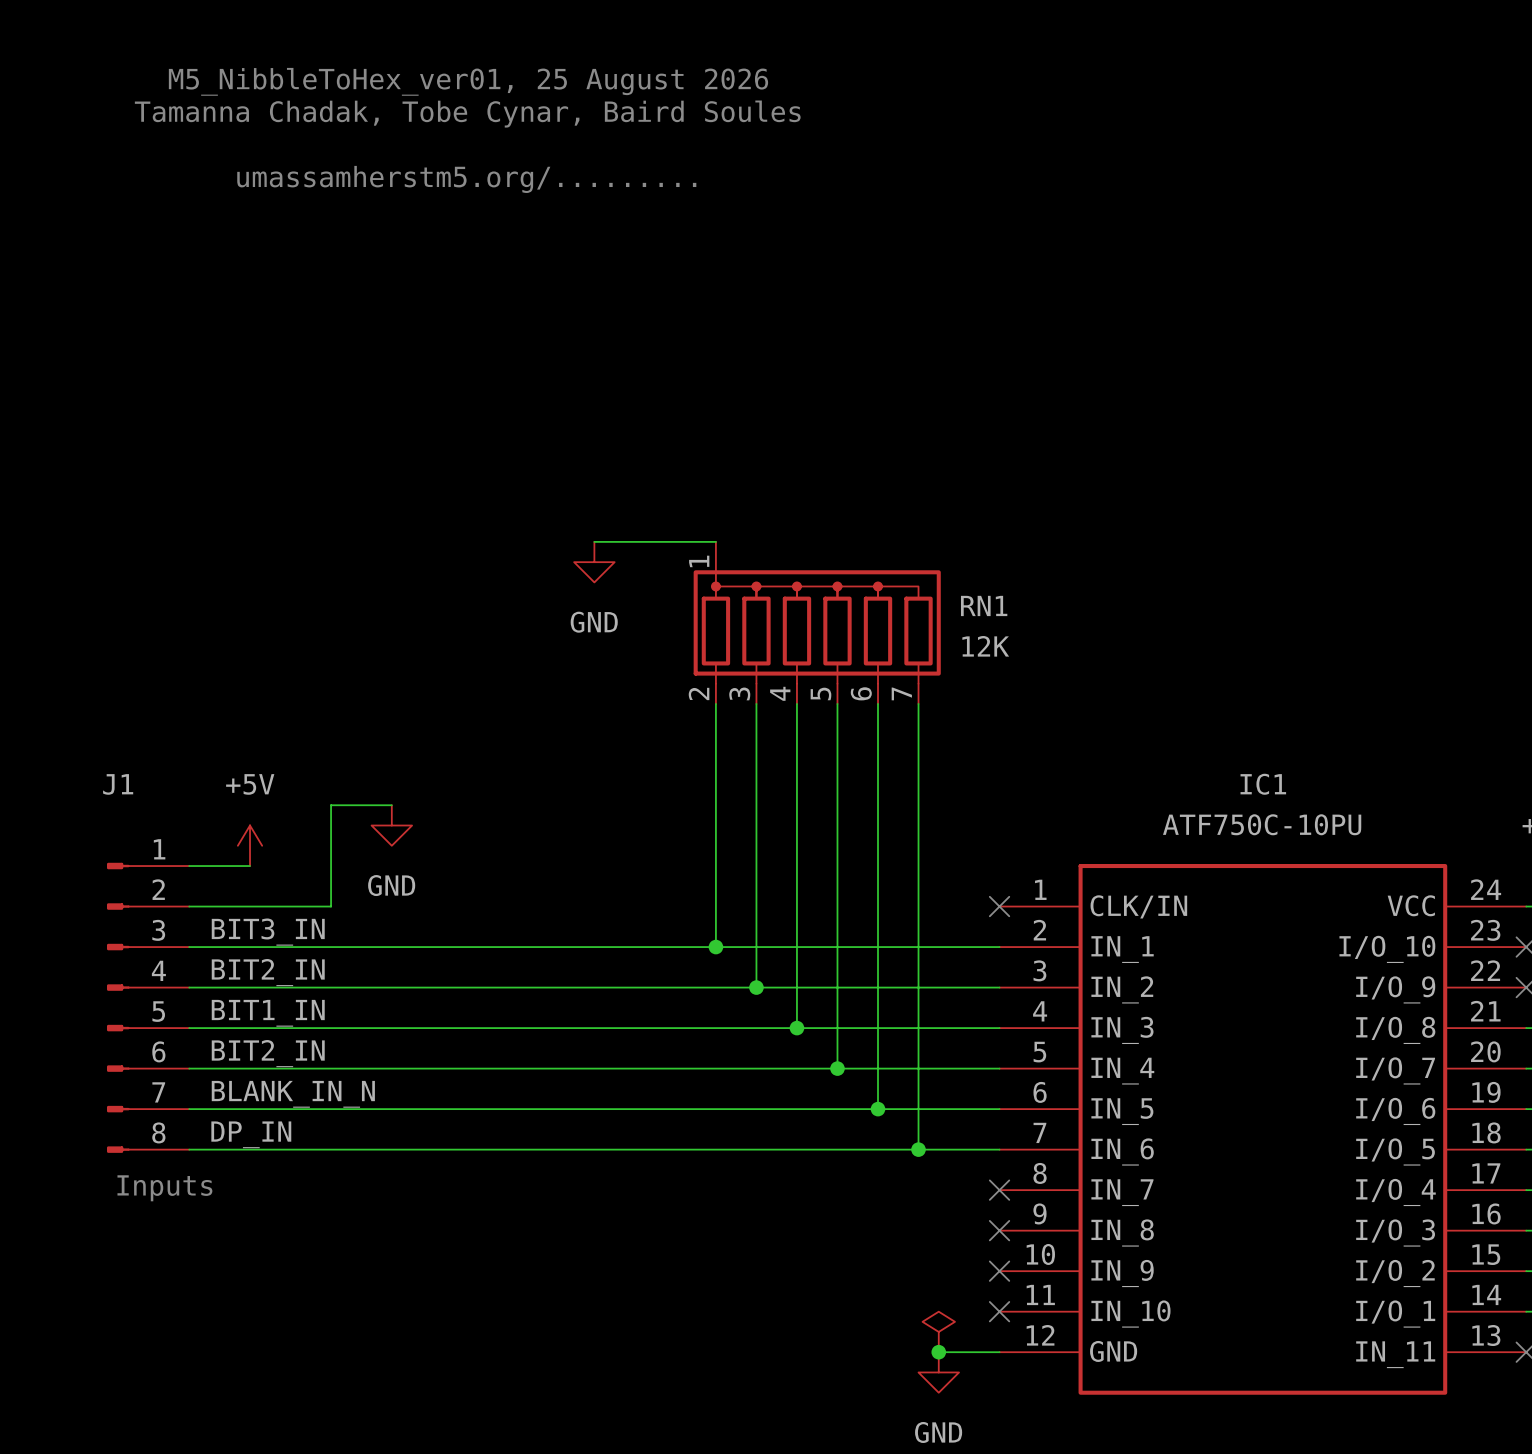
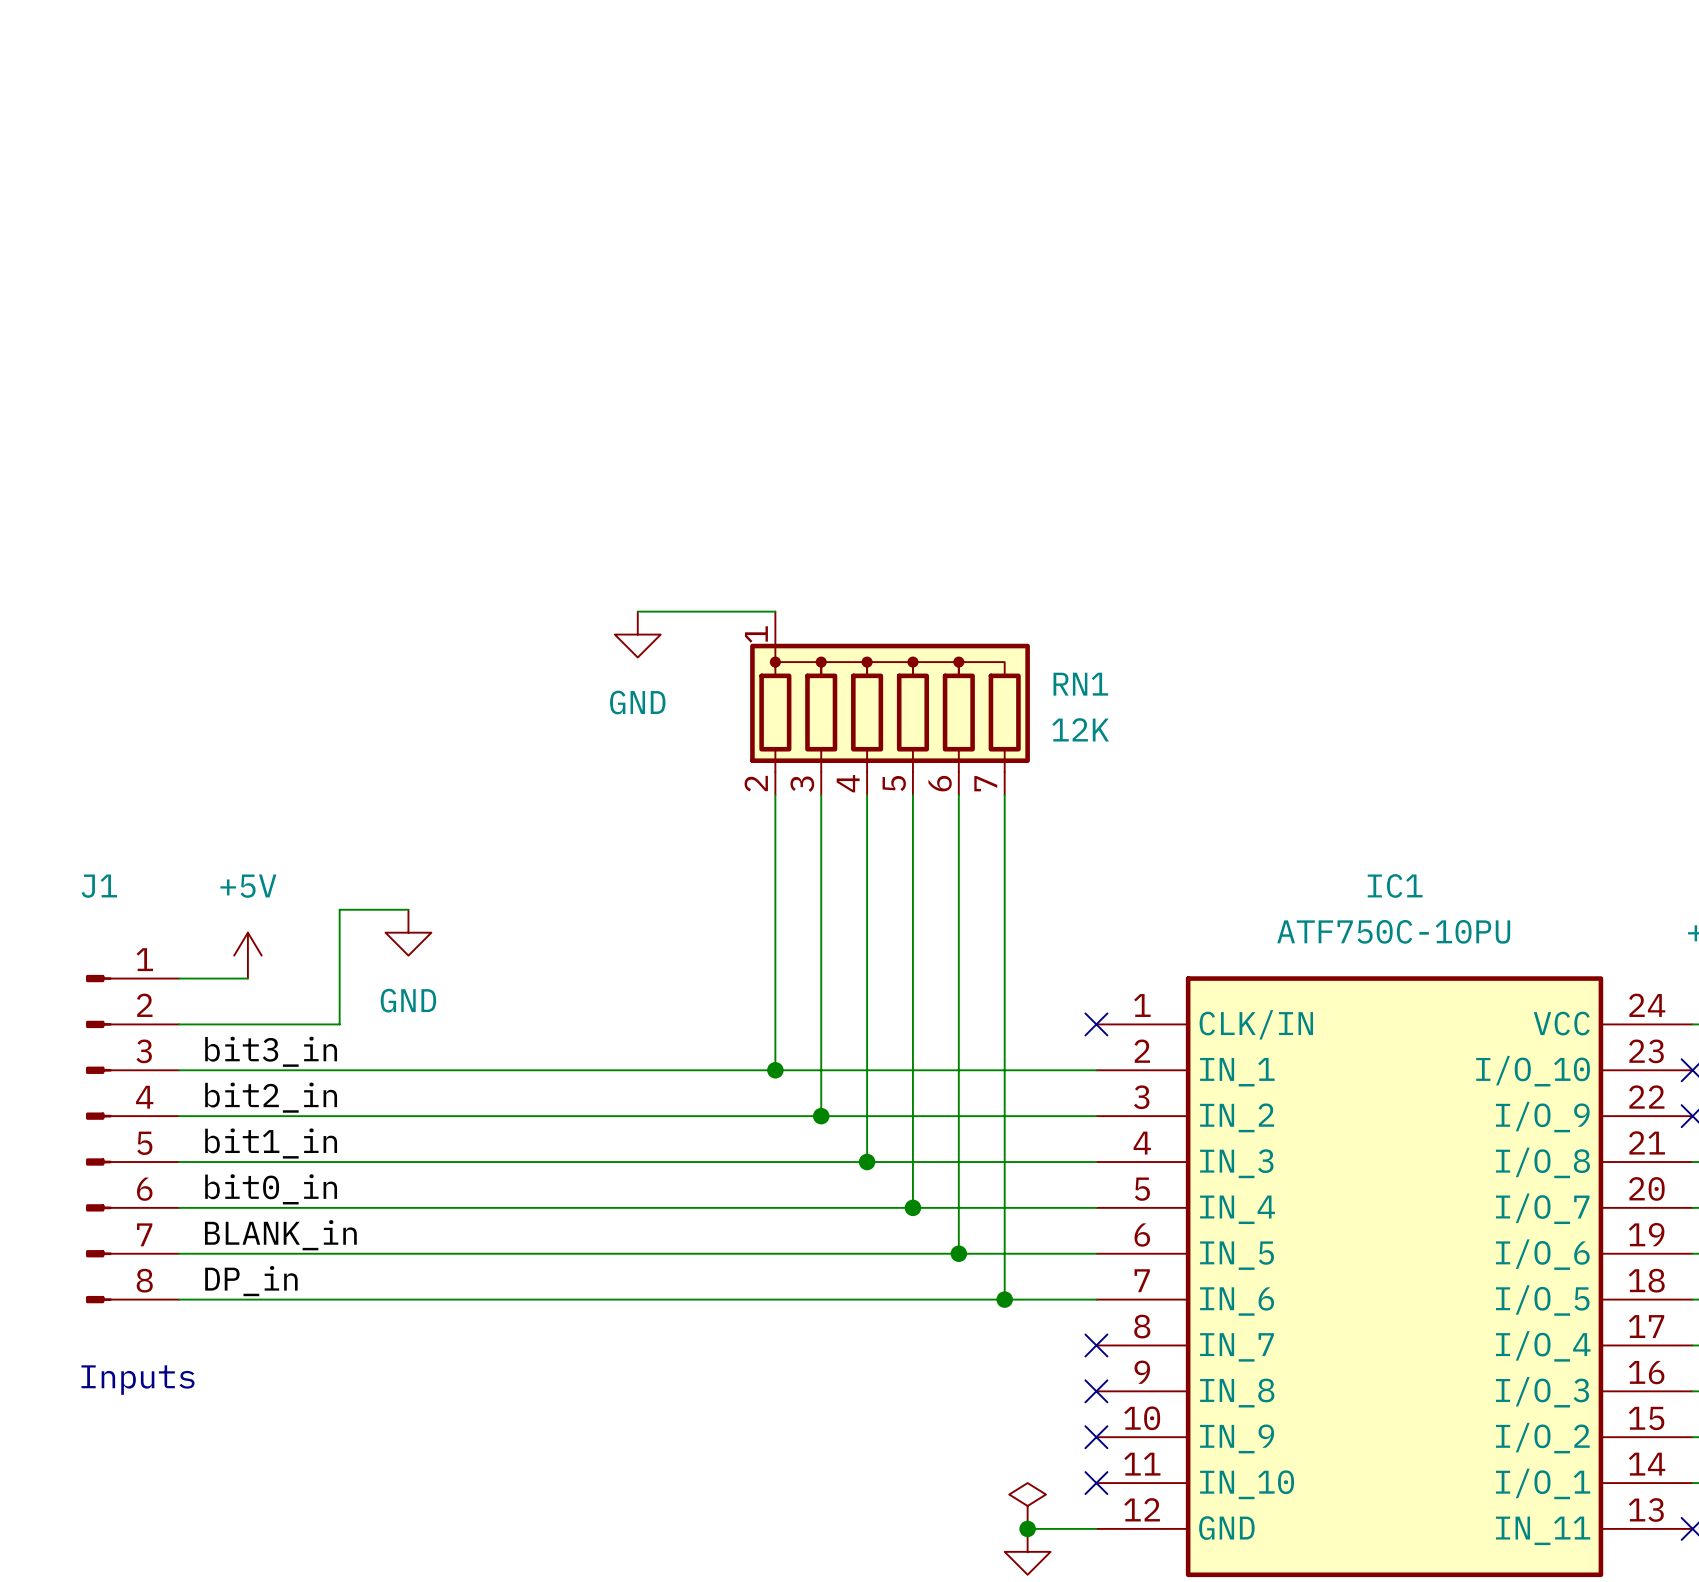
text: M5_NibbleToHex_ver01, 25 August 2026 (468, 81) -> none
text: Tamanna Chadak, Tobe Cynar, Baird Soules (467, 114) -> none
text: umassamherstm5.org/......... (466, 179) -> none
label: BIT3_IN (268, 932) -> bit3_in (271, 1051)
label: BIT2_IN (268, 972) -> bit2_in (271, 1097)
label: BIT1_IN (268, 1013) -> bit1_in (271, 1143)
label: BIT2_IN (268, 1053) -> bit0_in (271, 1189)
label: BLANK_IN_N (293, 1094) -> BLANK_in (280, 1235)
label: DP_IN (251, 1134) -> DP_in (251, 1281)
text position: Inputs (164, 1188) -> Inputs (137, 1380)

